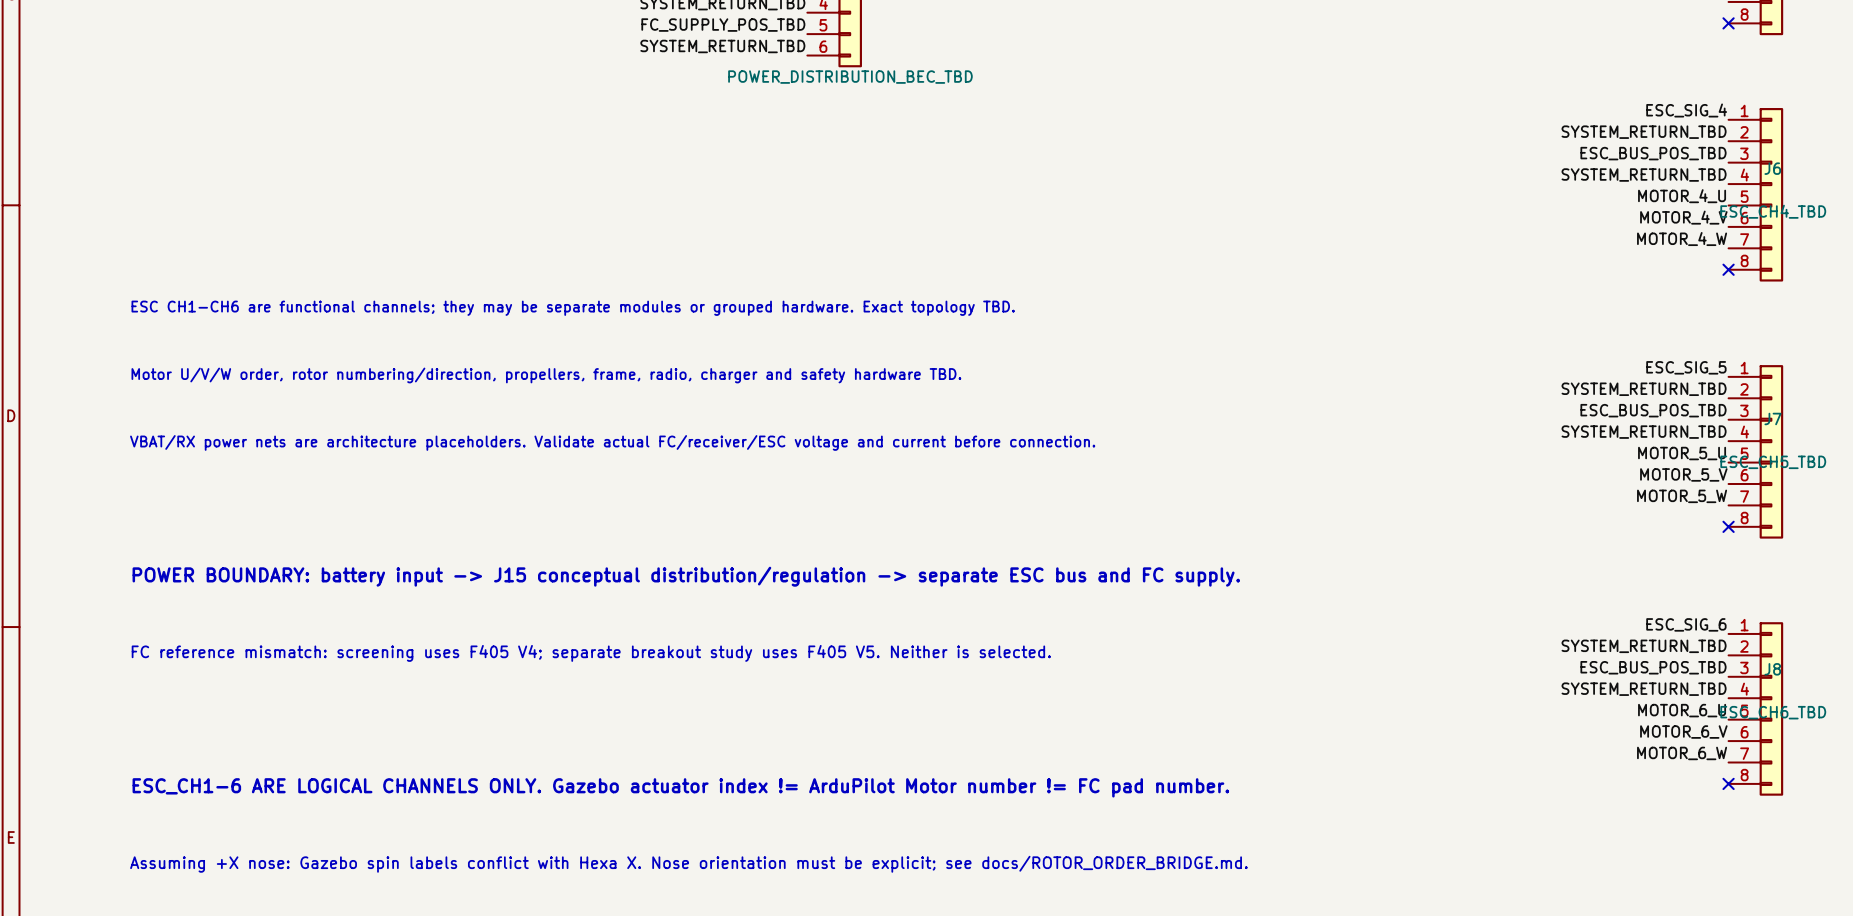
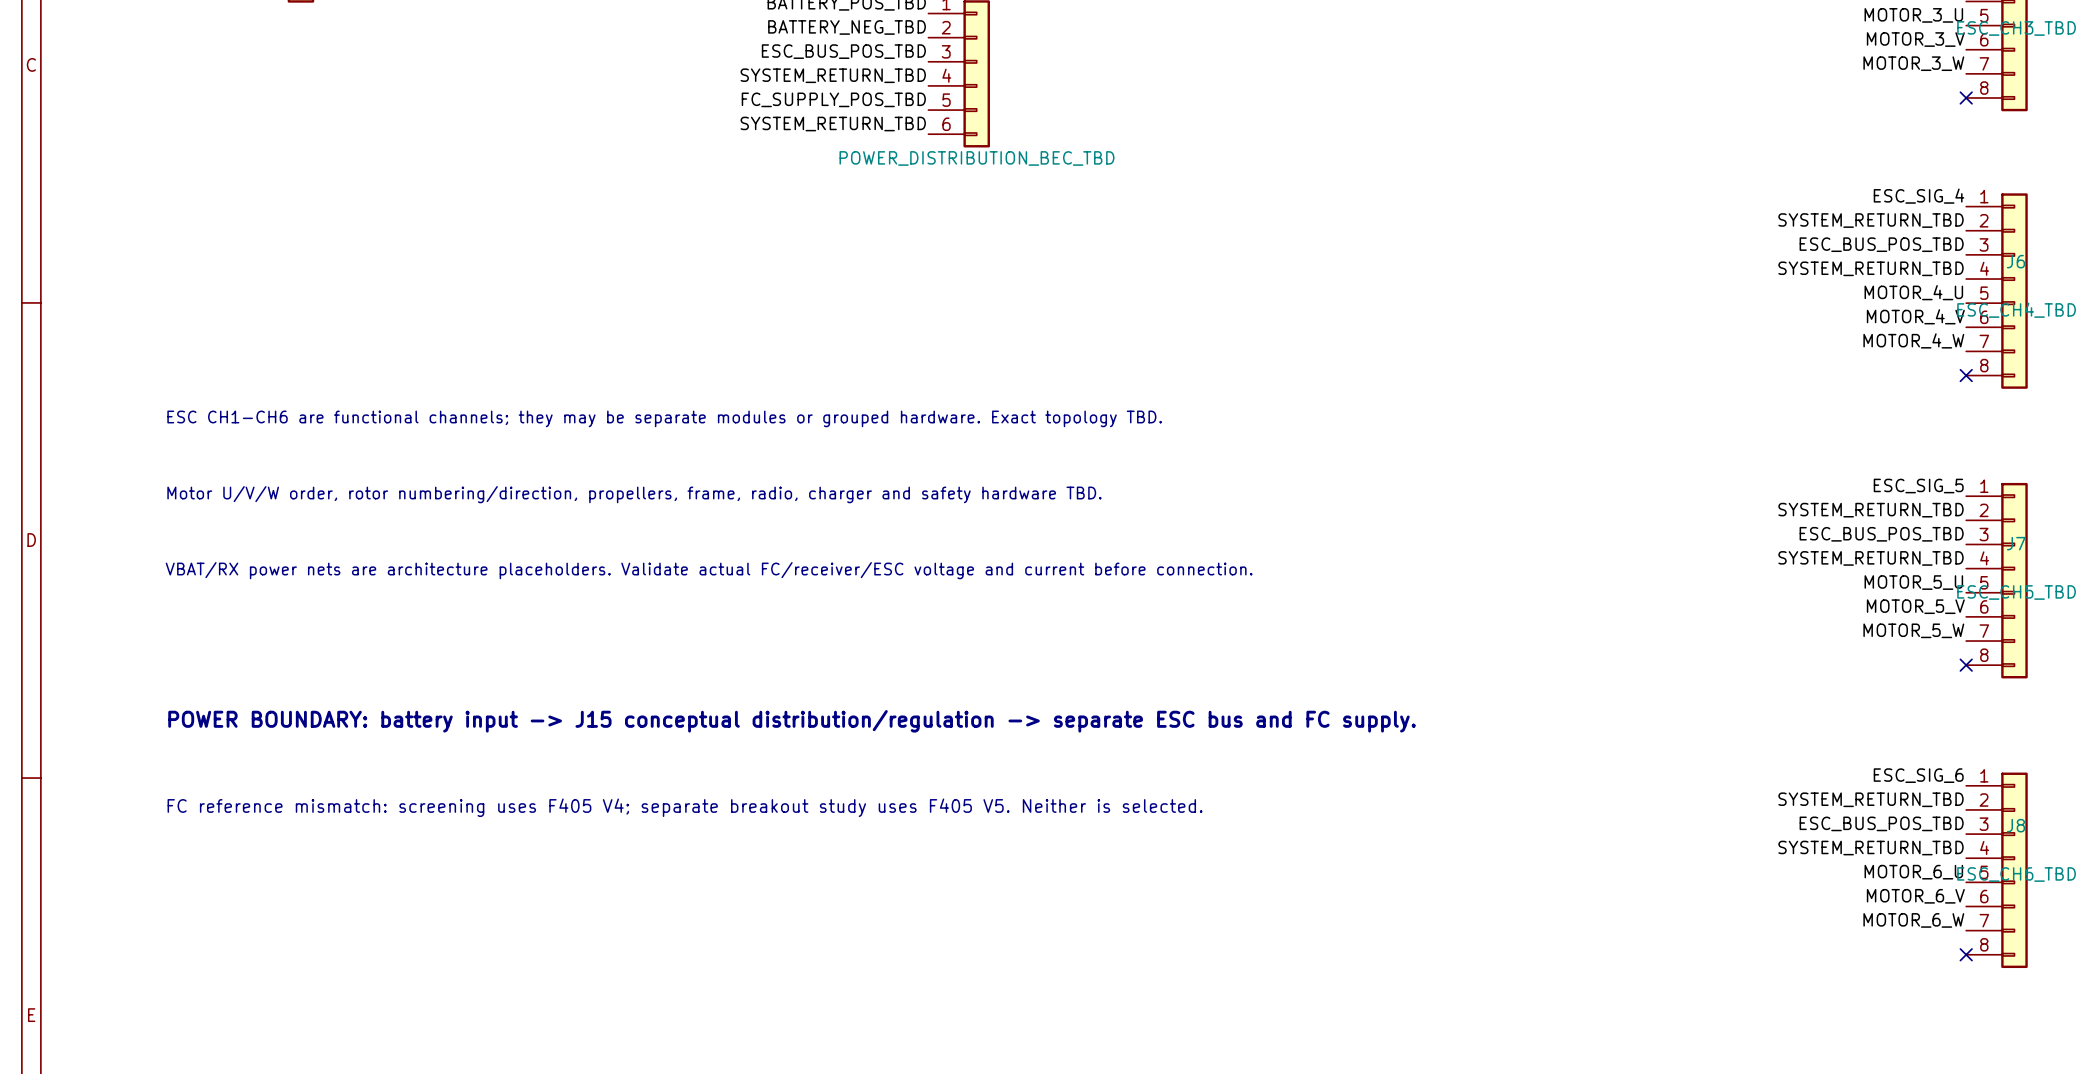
text: ESC_CH1-6 ARE LOGICAL CHANNELS ONLY. Gazebo actuator index != ArduPilot Motor number != FC pad number. (680, 787) -> none
text: Assuming +X nose: Gazebo spin labels conflict with Hexa X. Nose orientation must be explicit; see docs/ROTOR_ORDER_BRIDGE.md. (688, 864) -> none

